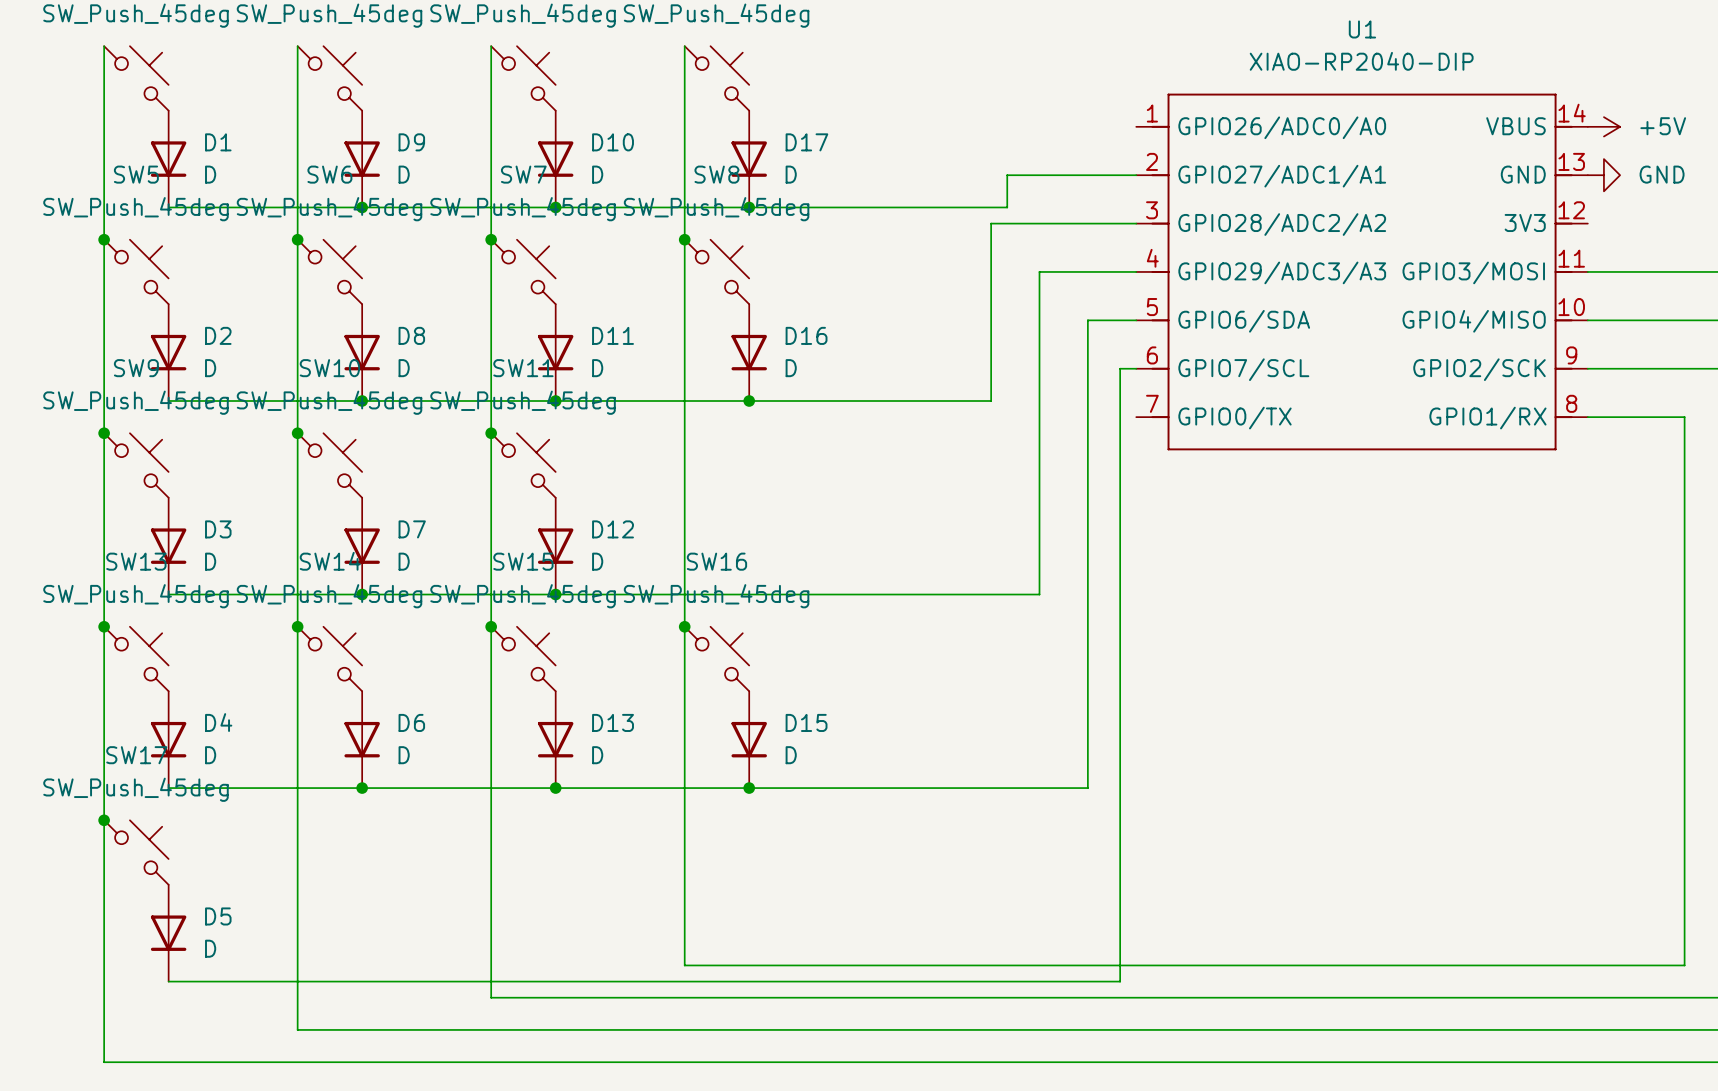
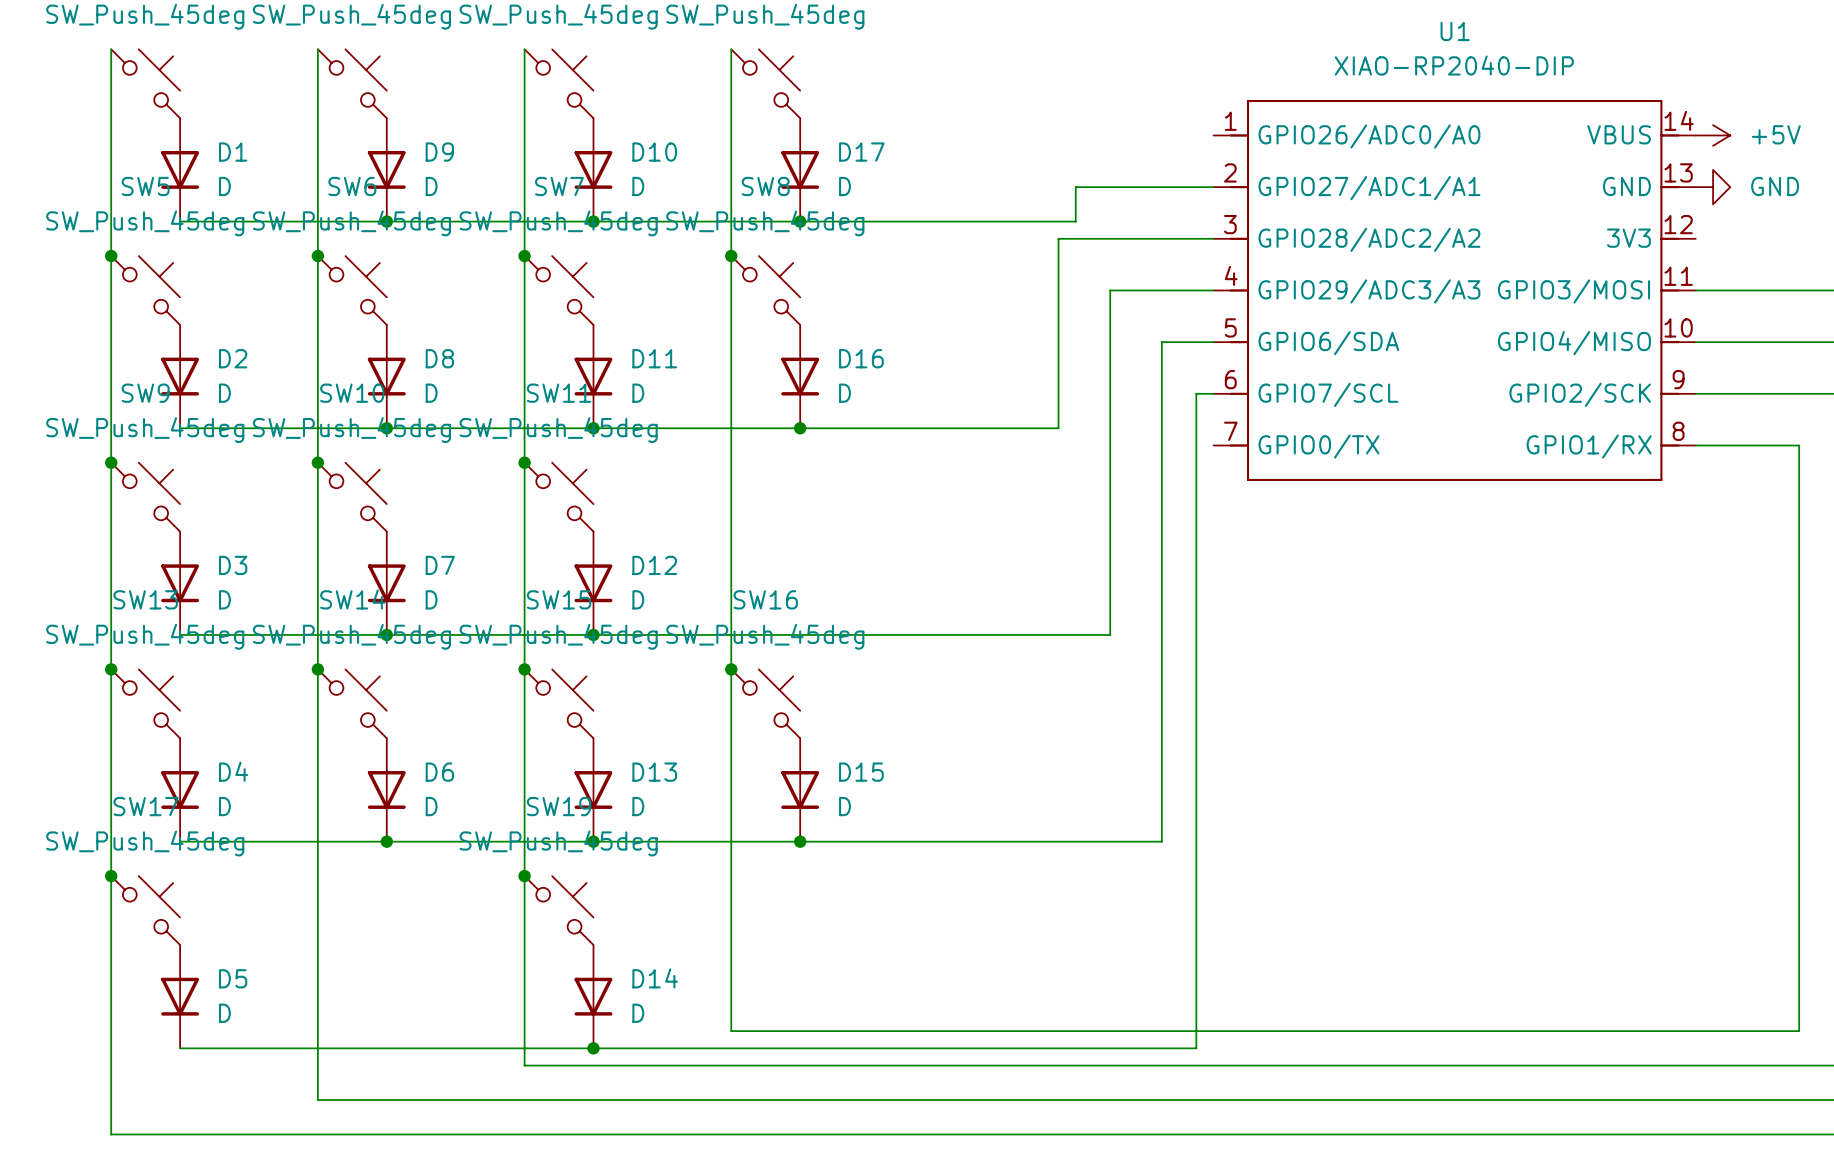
junction: none -> (524, 876)
SW19: none -> SW_Push_45deg (559, 910)
D14: none -> D (593, 996)
junction: none -> (593, 1048)

